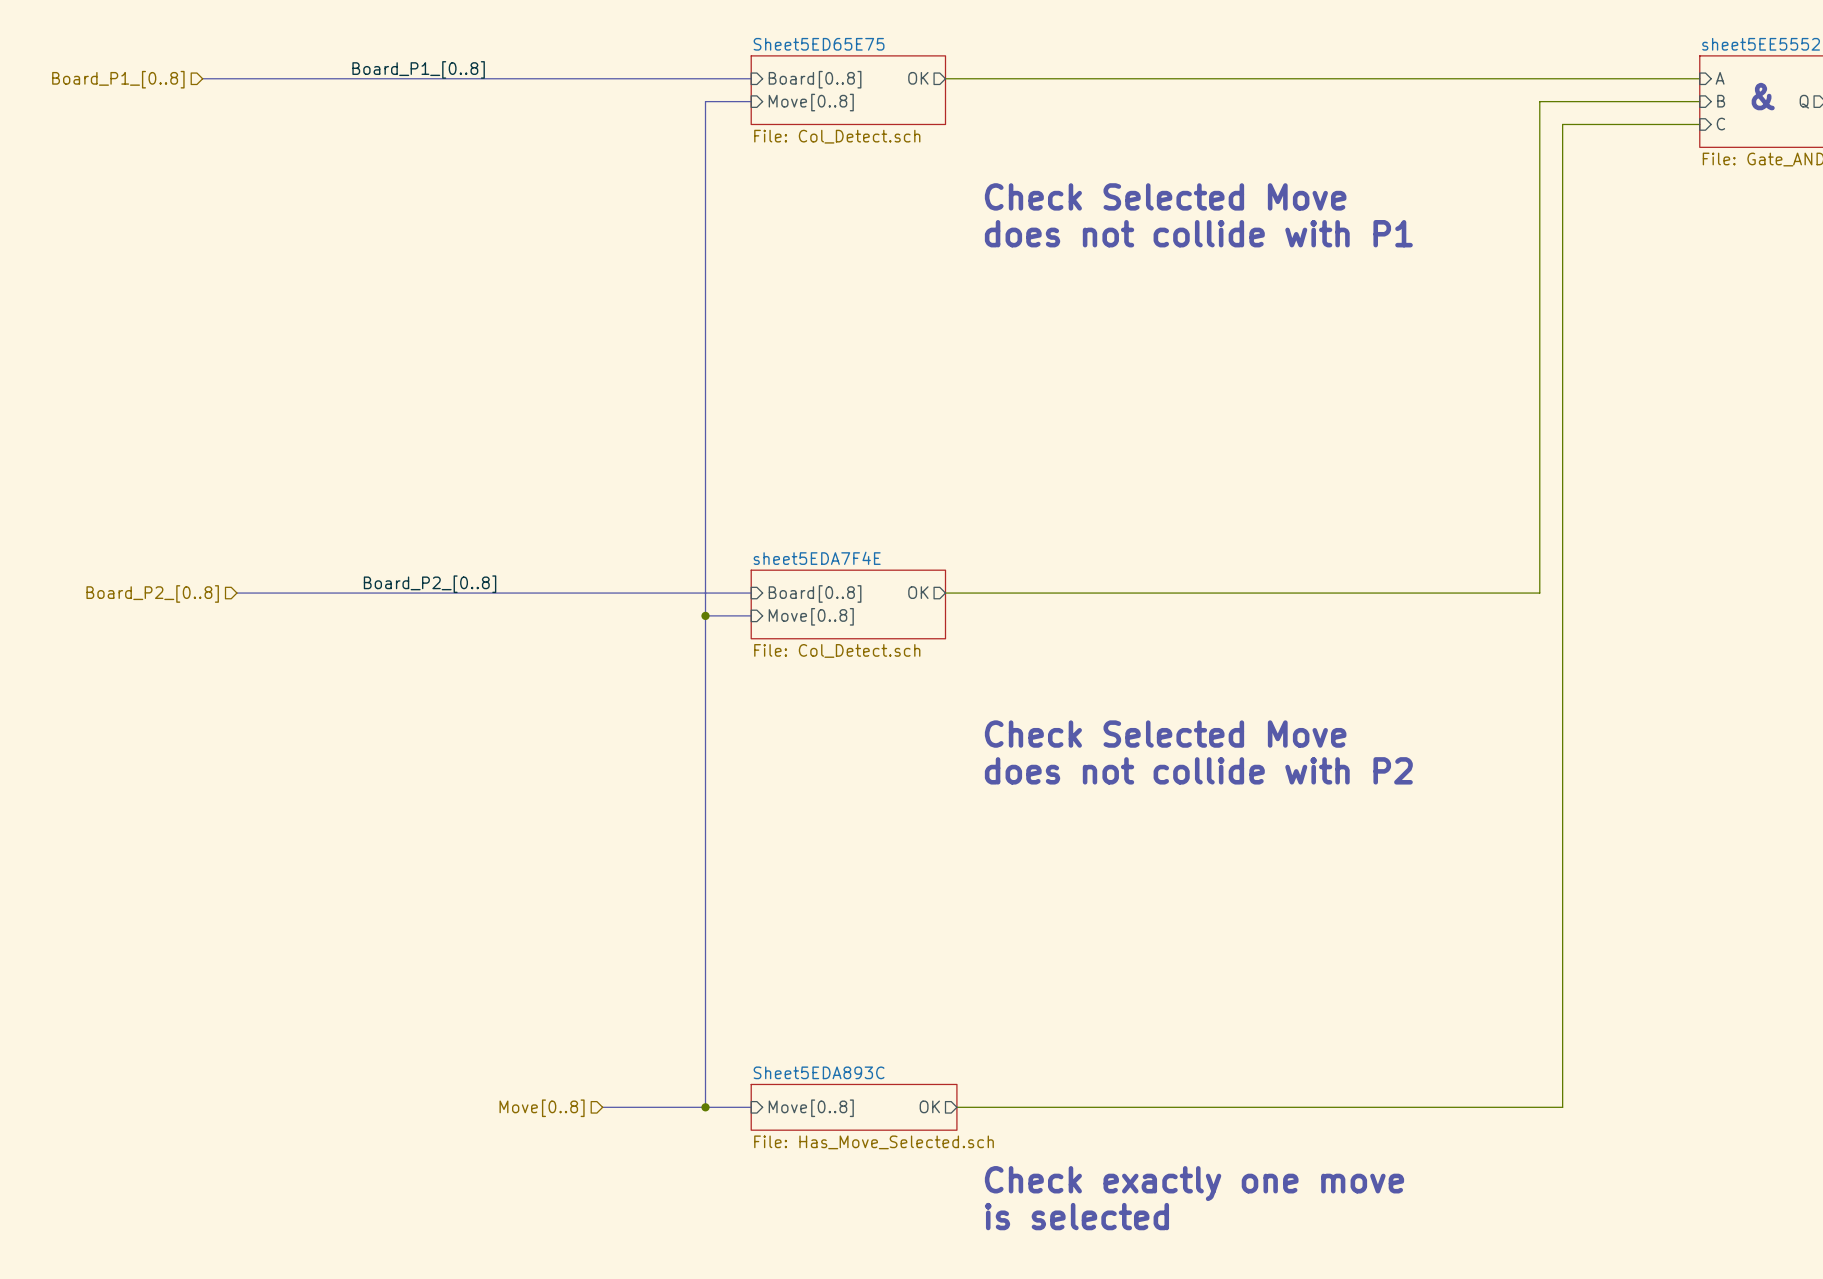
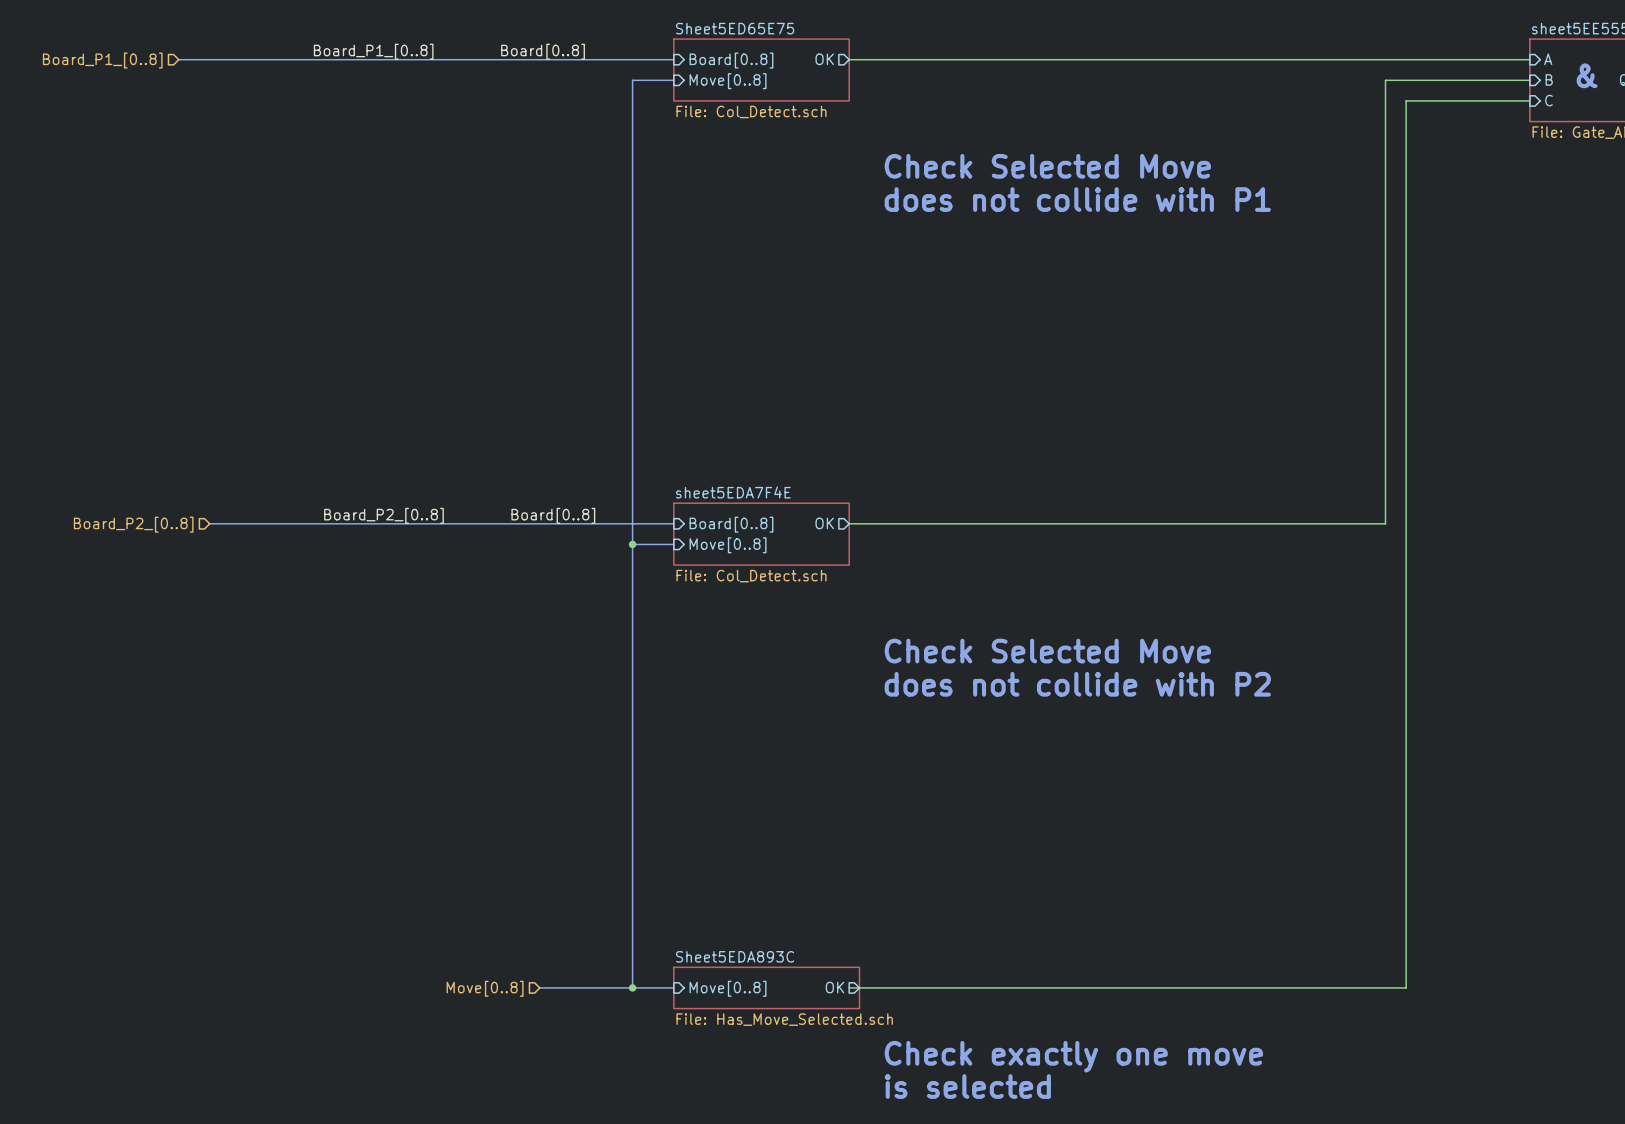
label: none -> Board[0..8] (543, 51)
label: none -> Board[0..8] (553, 515)
wire: none -> (849, 987) (859, 987)

